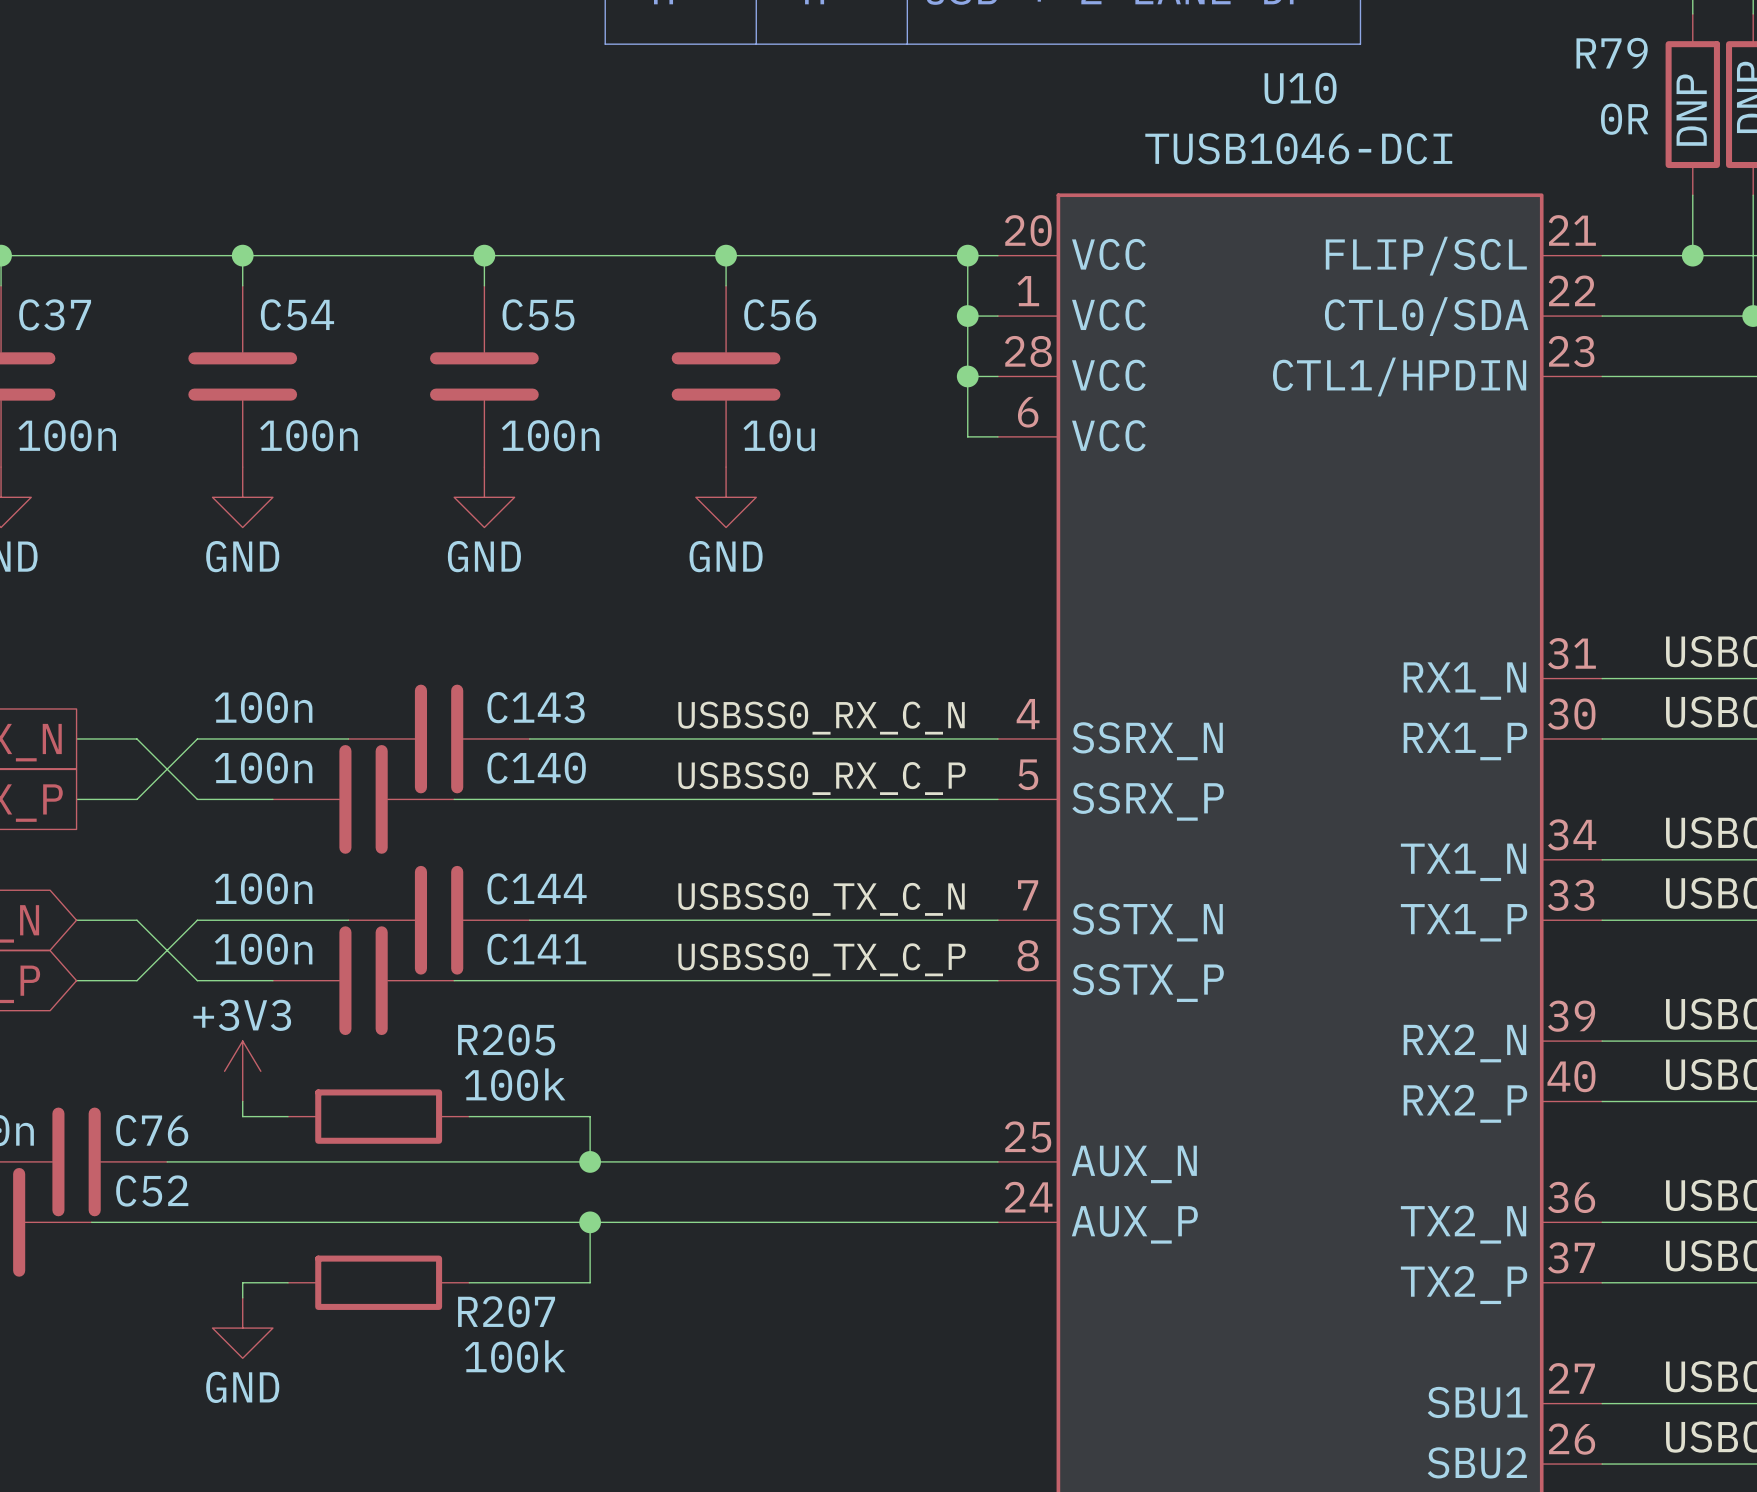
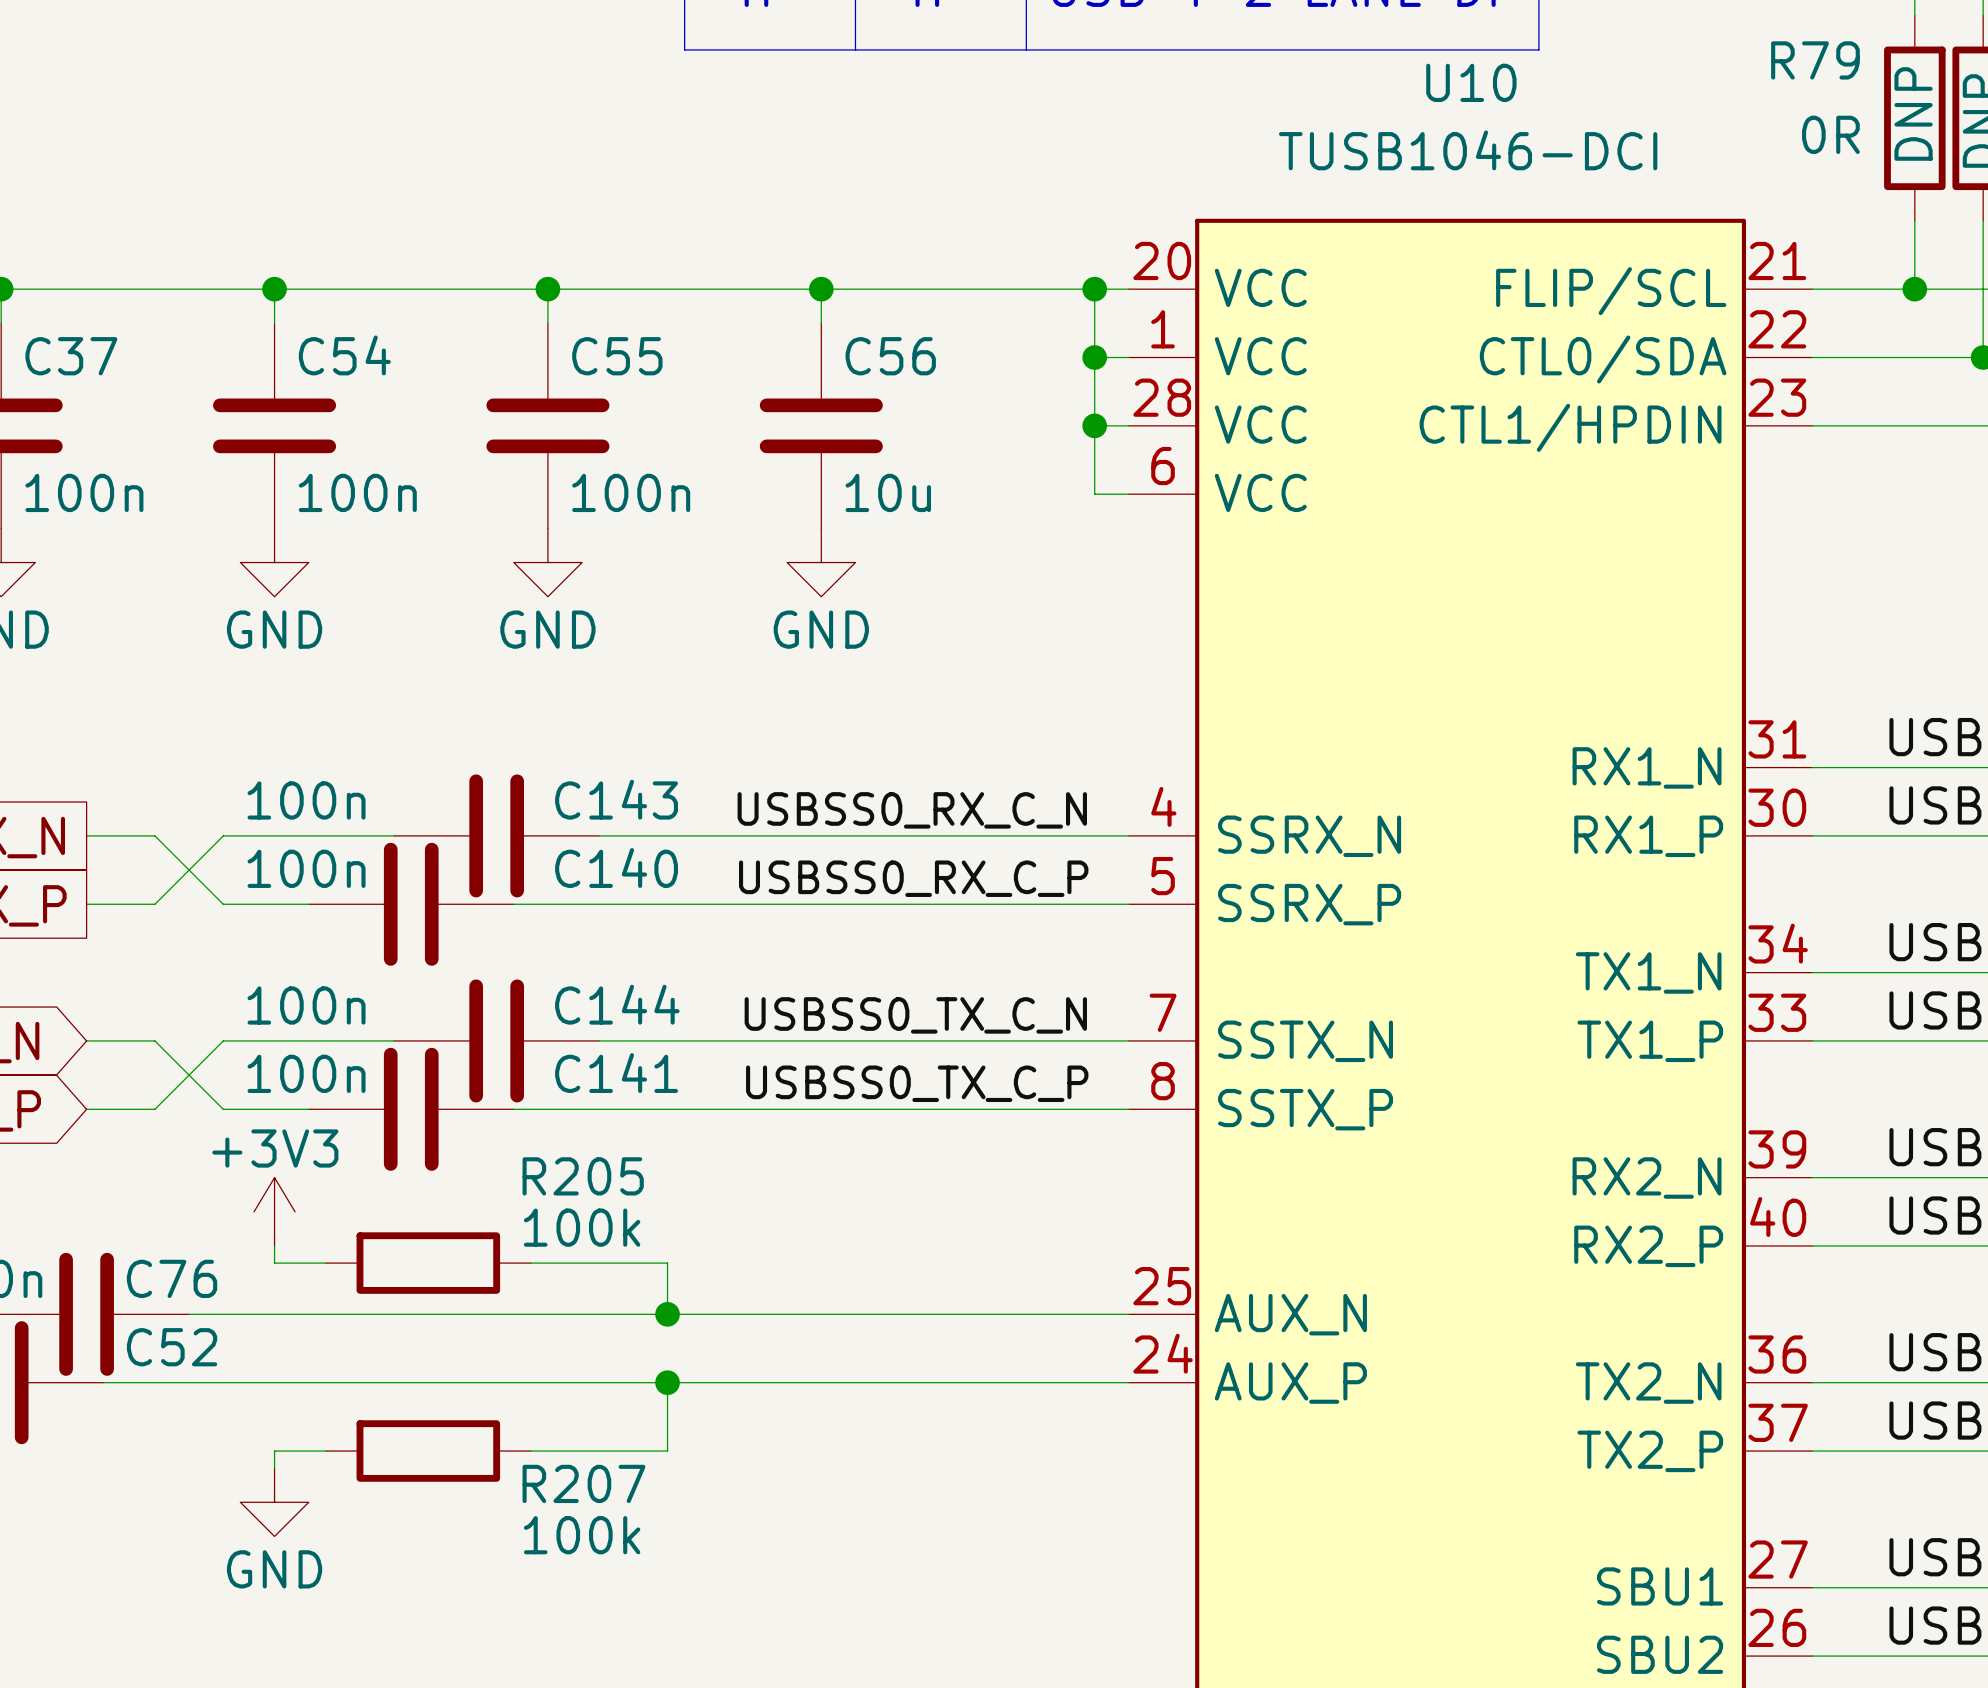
U10 name position: U10 (1300, 88) -> U10 (1471, 82)
U10 value position: TUSB1046-DCI (1298, 148) -> TUSB1046-DCI (1468, 150)

